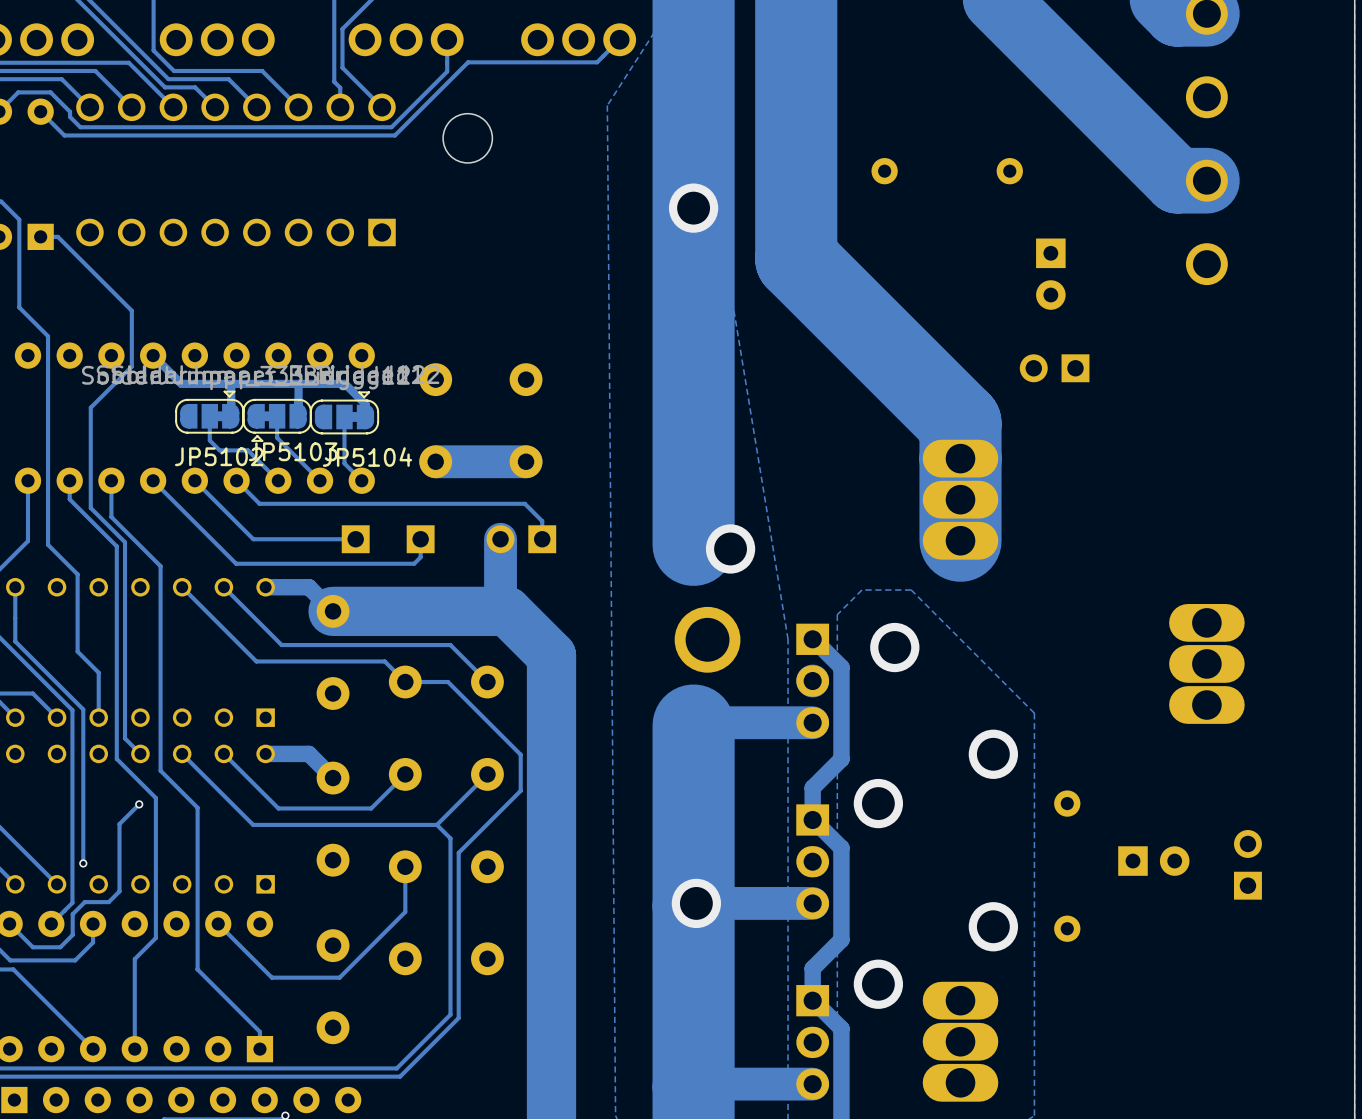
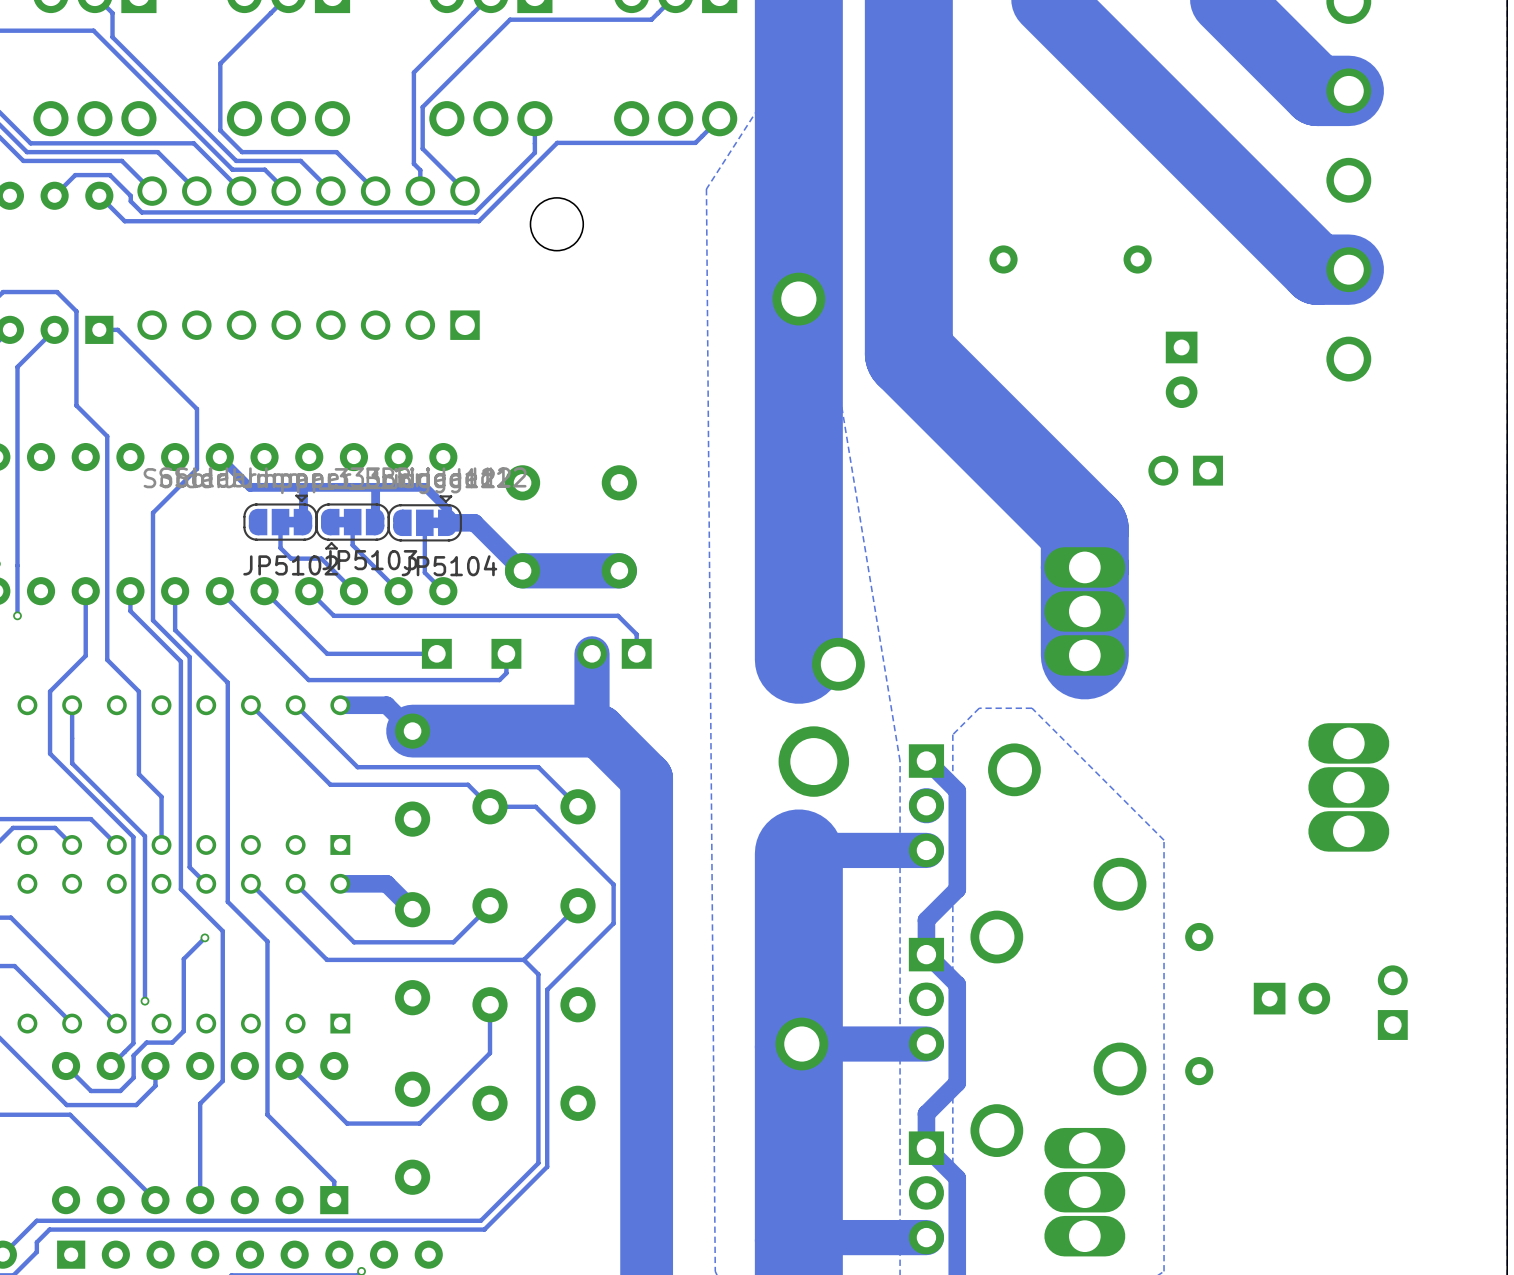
track: none -> (447, 522) (474, 522) (522, 570)

